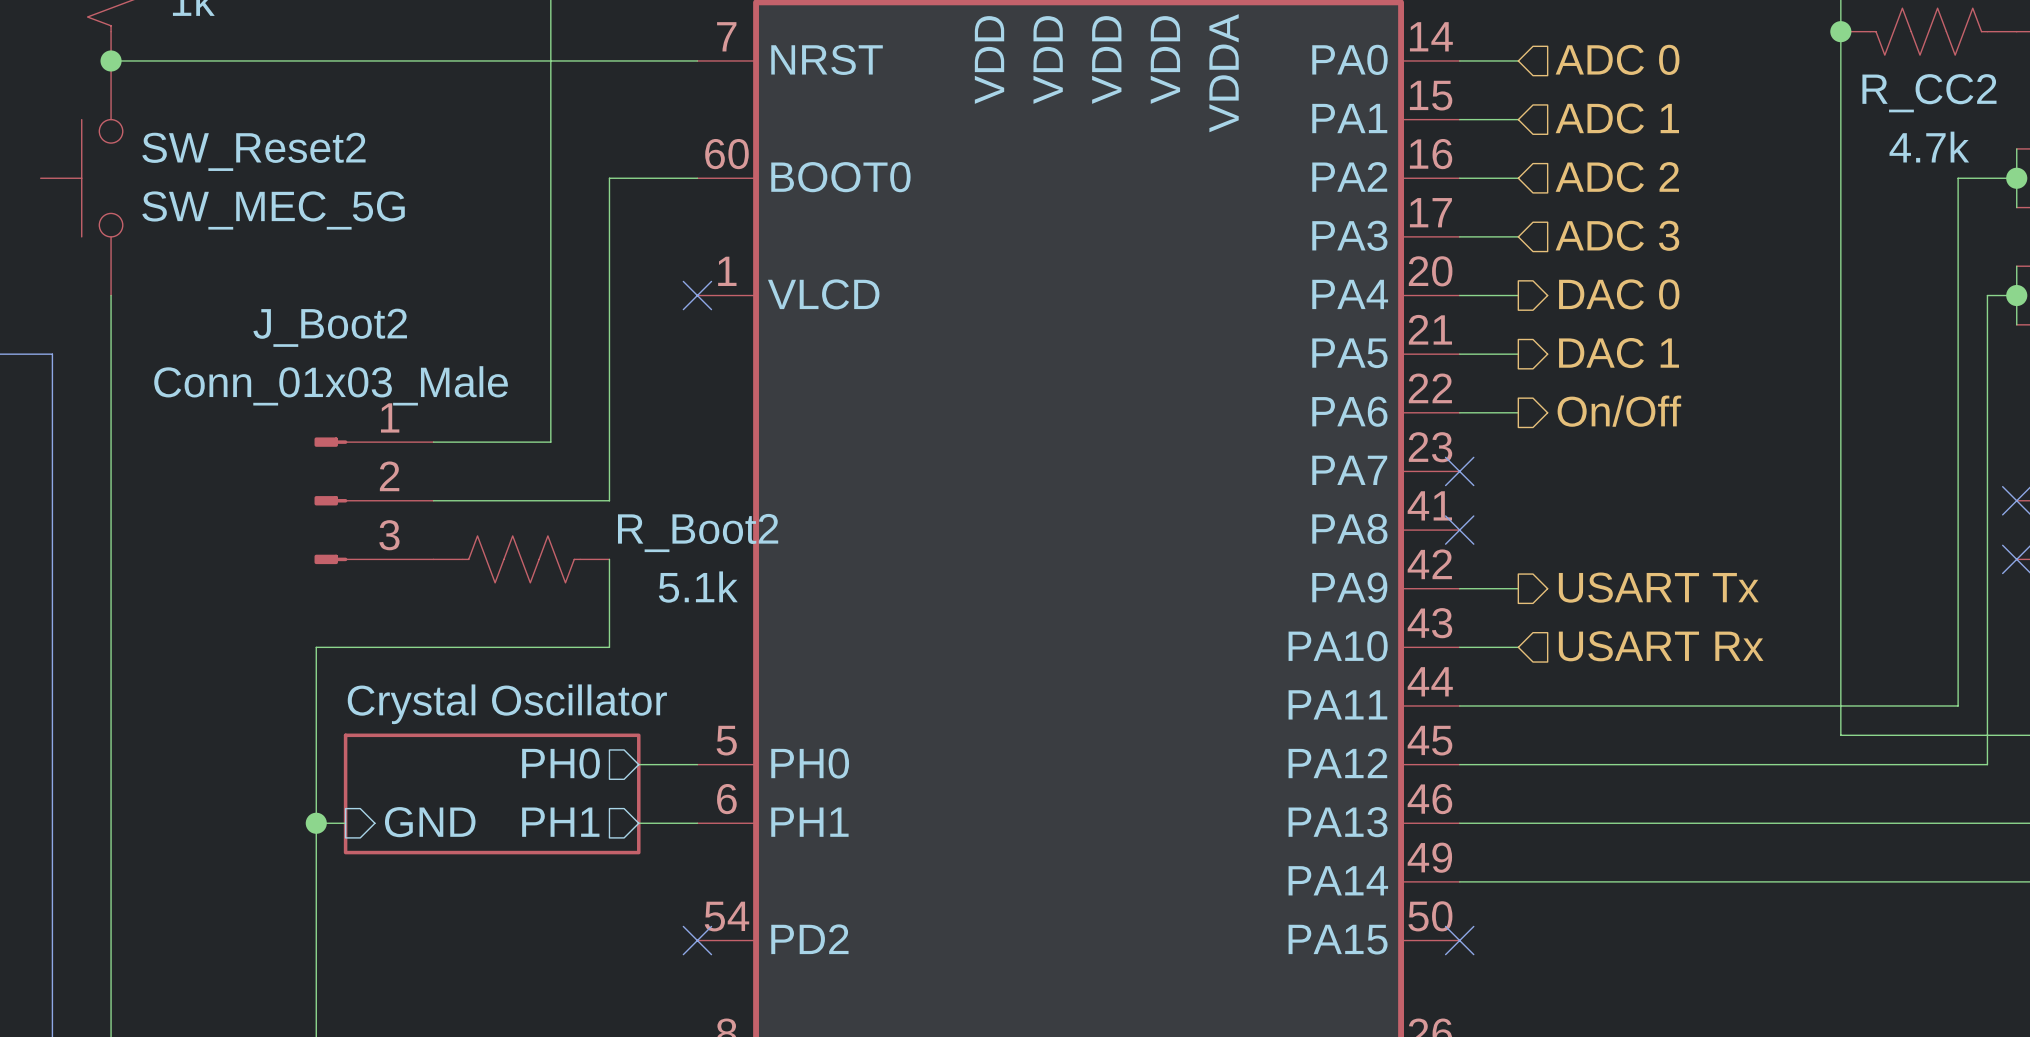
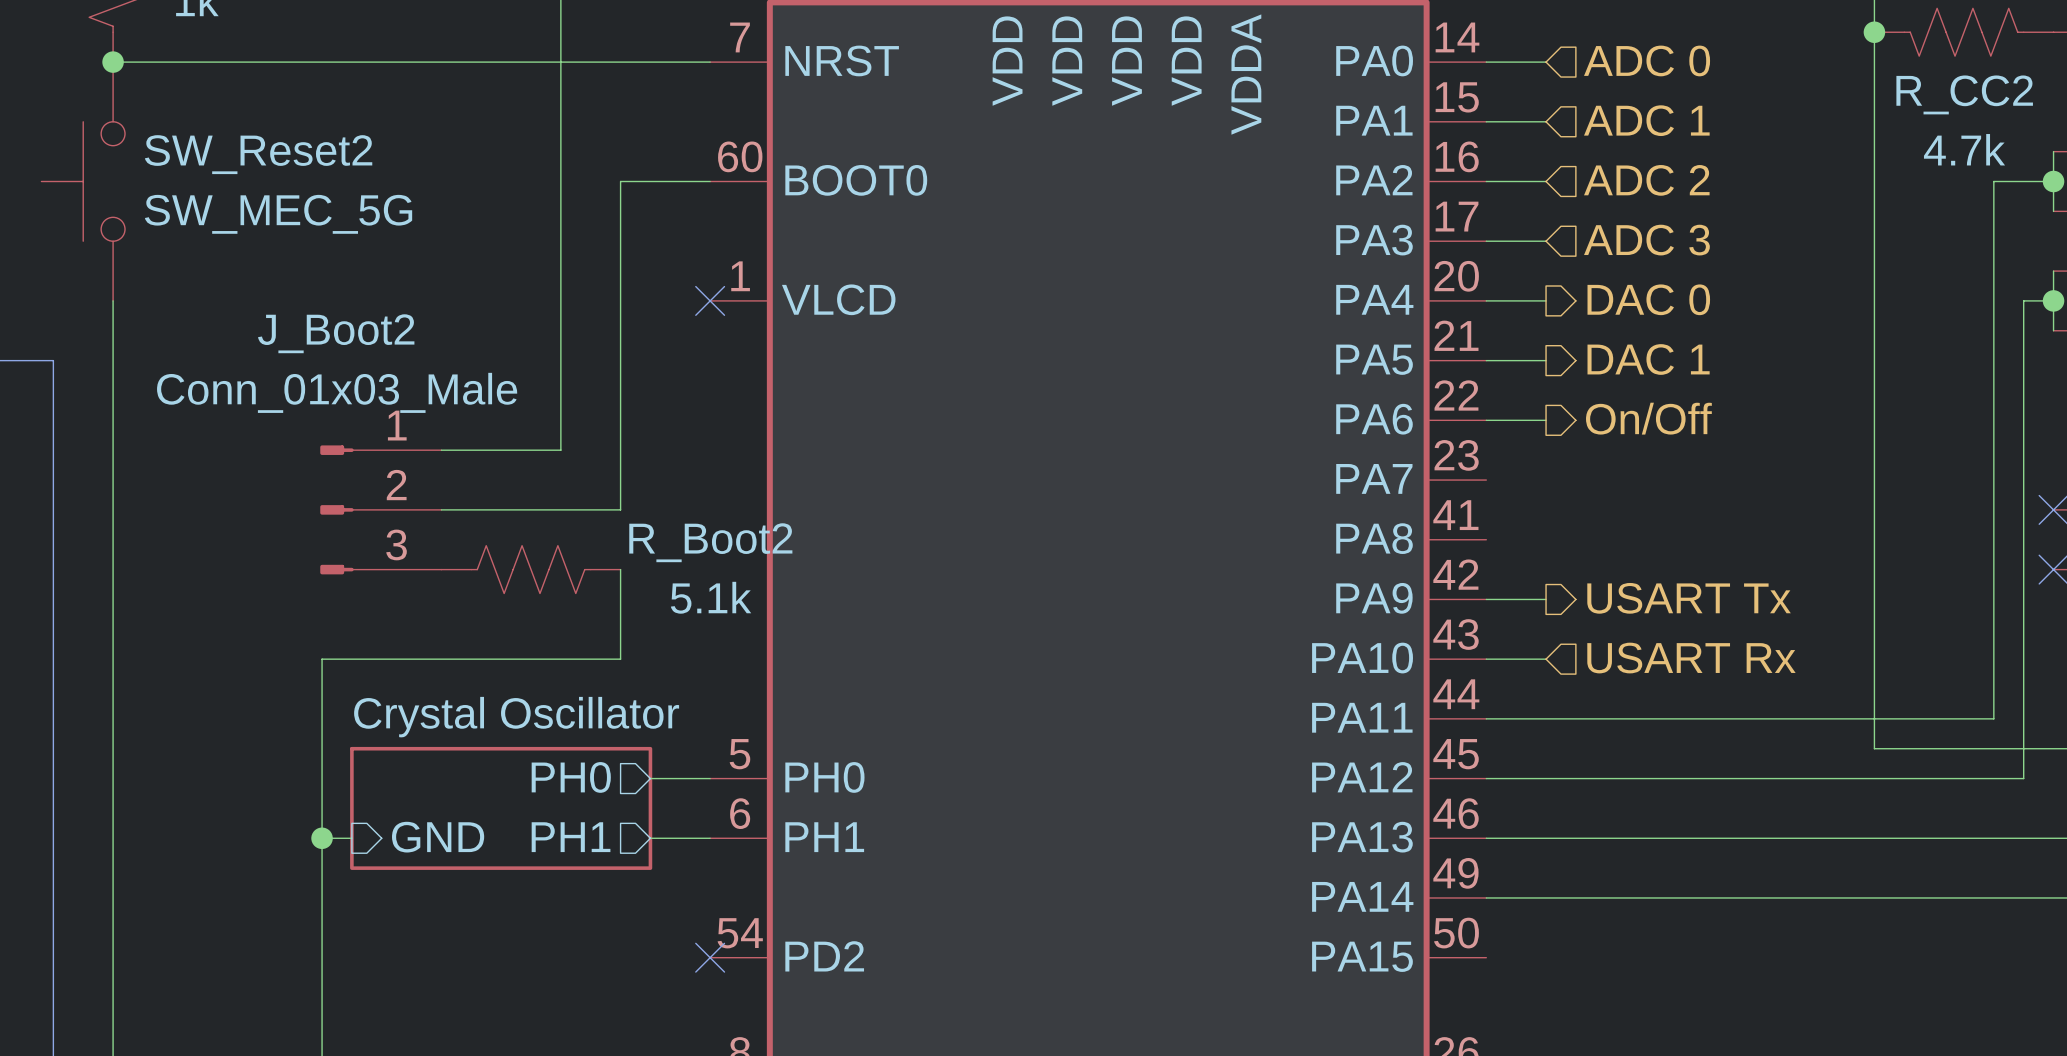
no-connect mark: (1459, 471) -> none
no-connect mark: (1459, 530) -> none
no-connect mark: (1459, 940) -> none

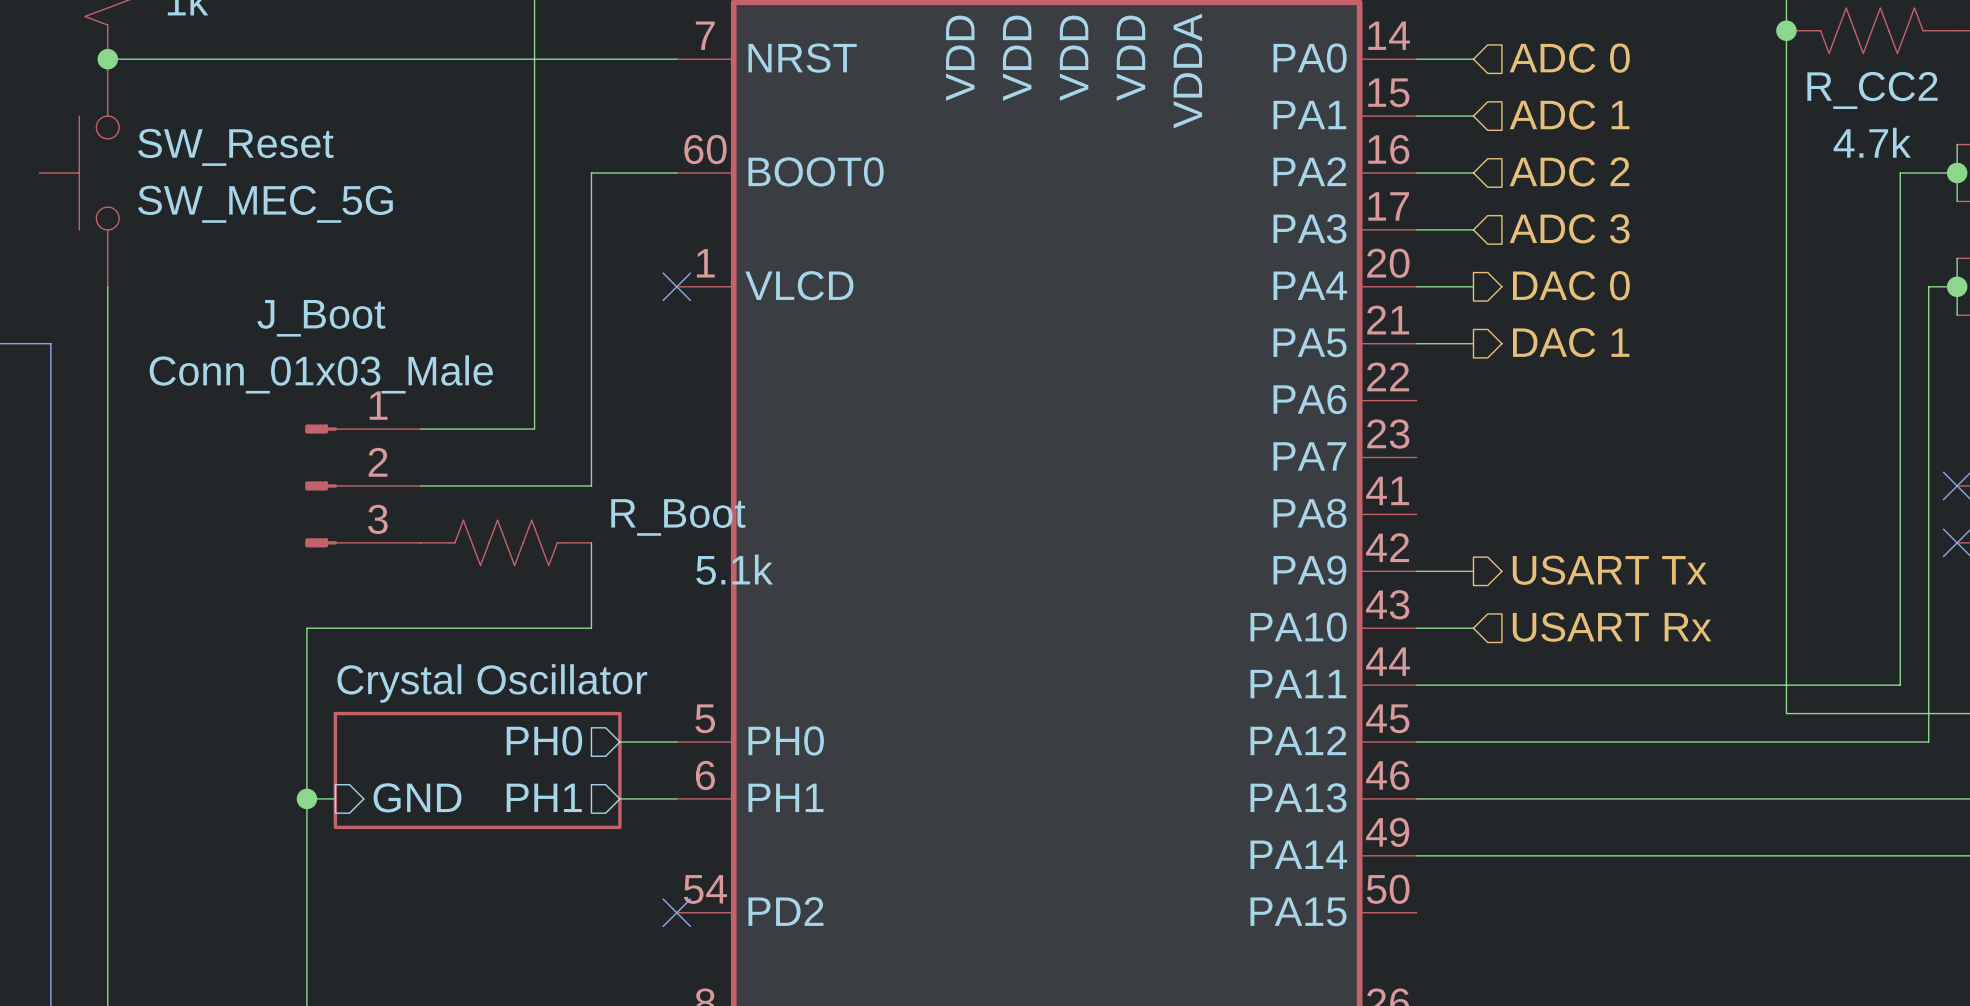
SW_Reset2 name: SW_Reset2 (258, 154) -> SW_Reset (235, 147)
J_Boot2 name: J_Boot2 (336, 333) -> J_Boot (321, 318)
hierarchical label: On/Off (1648, 418) -> none
wire: (1486, 420) (1546, 420) -> none
R_Boot2 name: R_Boot2 (710, 542) -> R_Boot (678, 517)
R_Boot2 value position: 5.1k (711, 597) -> 5.1k (734, 569)

